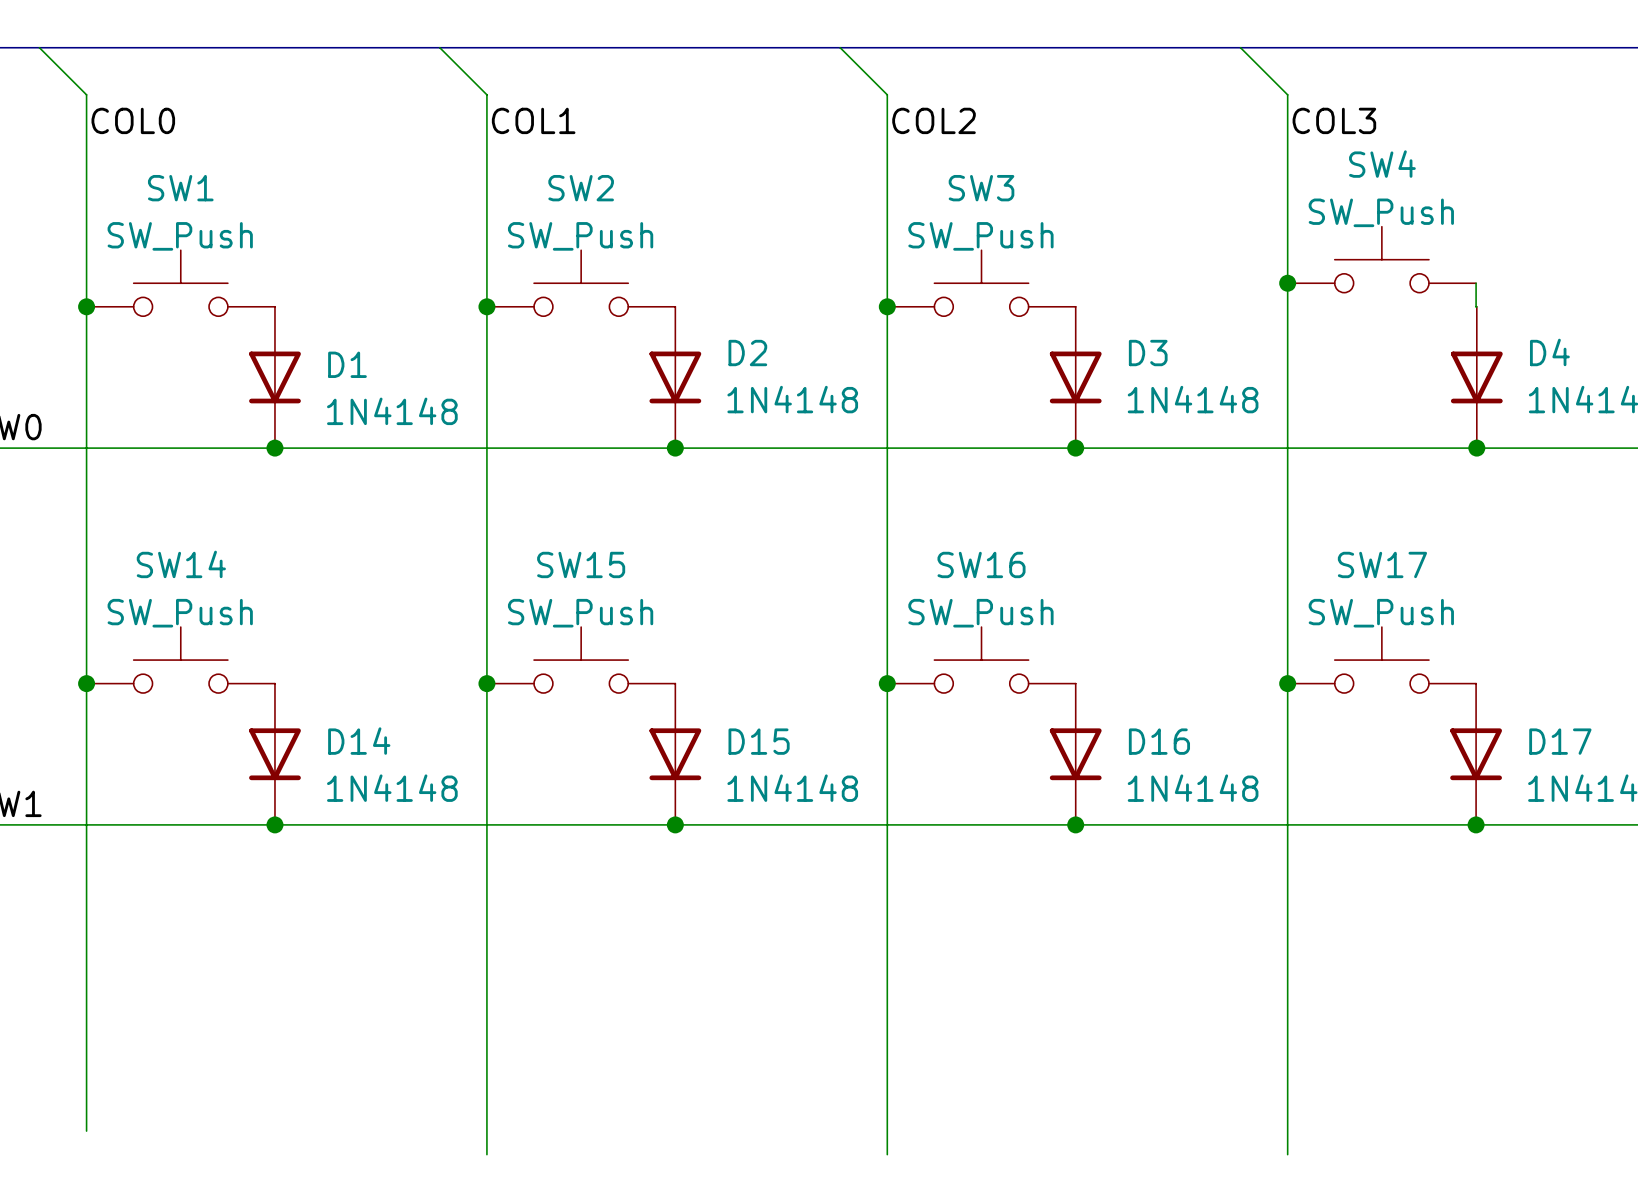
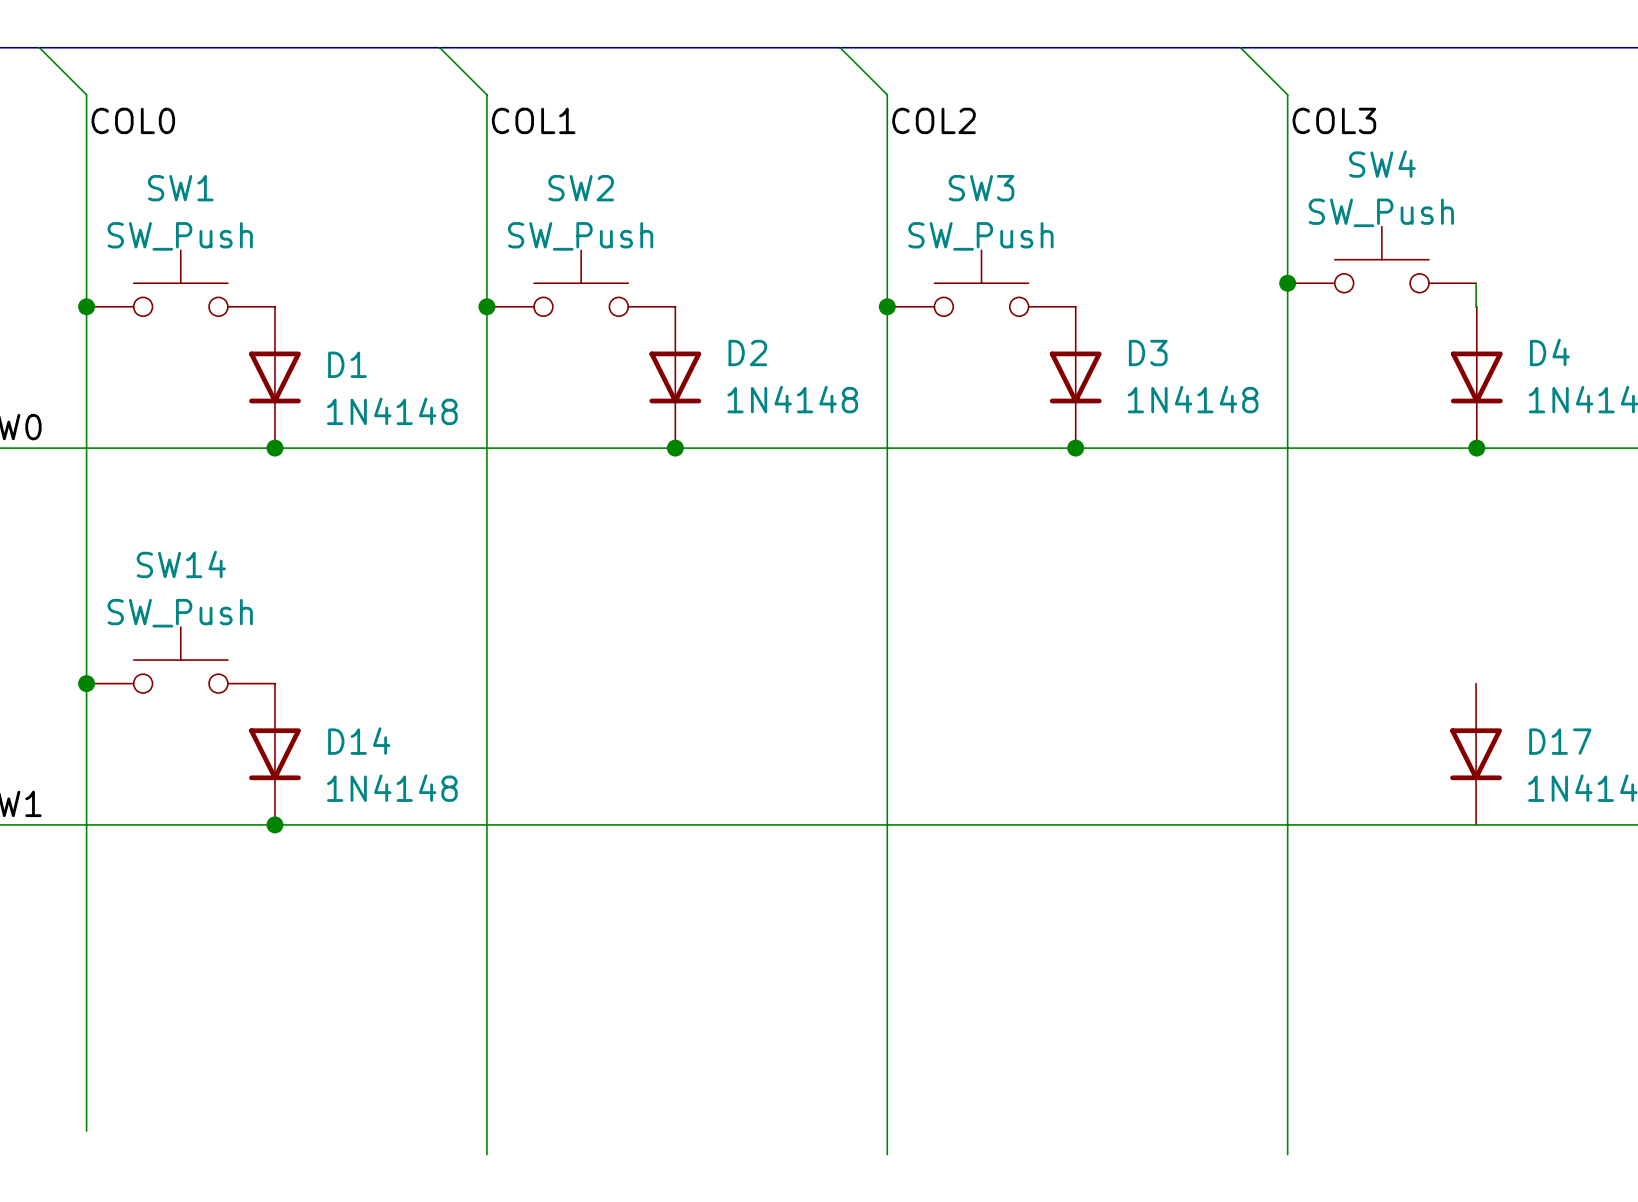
SW15: SW_Push (581, 660) -> none
SW16: SW_Push (981, 660) -> none
SW17: SW_Push (1381, 660) -> none
junction: (486, 683) -> none
junction: (887, 683) -> none
junction: (1287, 683) -> none
D15: 1N4148 (675, 754) -> none
D16: 1N4148 (1075, 754) -> none
junction: (675, 824) -> none
junction: (1075, 824) -> none
junction: (1476, 824) -> none

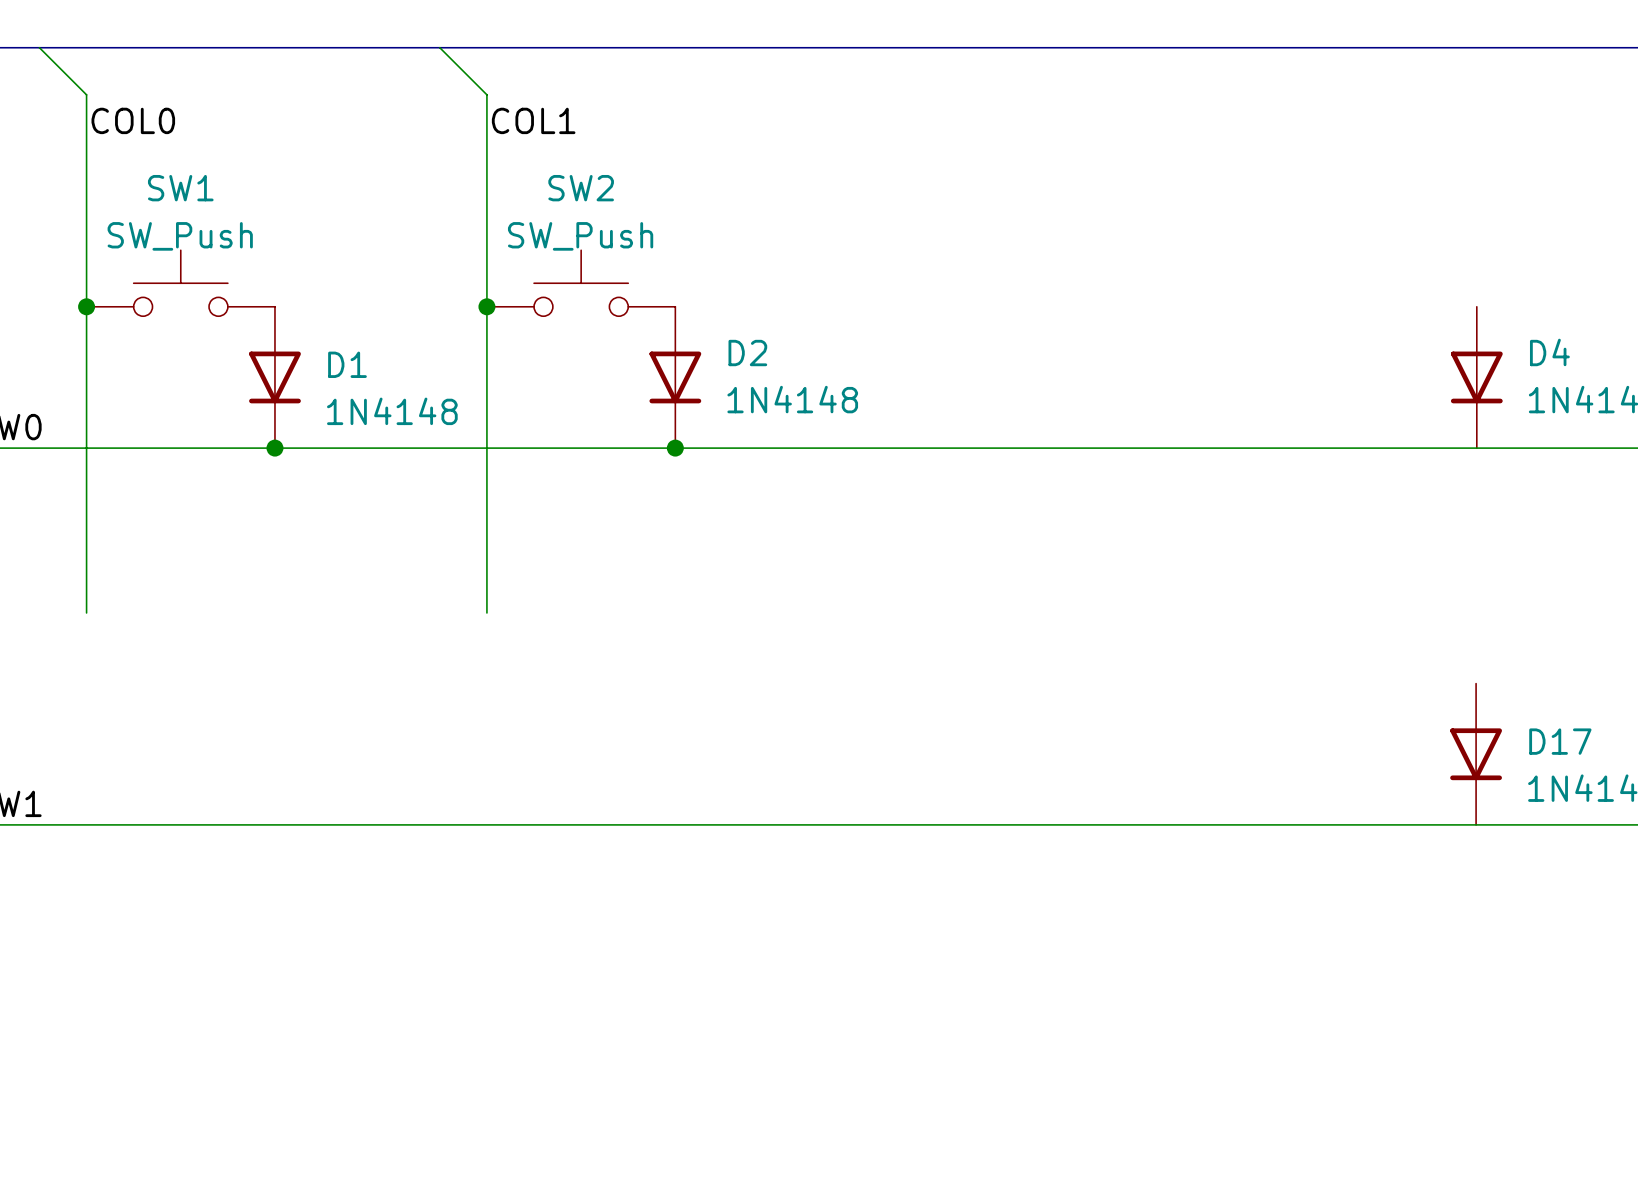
wire: (840, 47) (887, 94) (887, 1154) -> none
wire: (1240, 47) (1287, 94) (1287, 1154) -> none
label: COL2 (934, 120) -> none
label: COL3 (1334, 120) -> none
SW4: SW_Push (1381, 259) -> none
SW3: SW_Push (981, 283) -> none
junction: (1287, 283) -> none
wire: (1476, 283) (1476, 306) -> none
junction: (887, 306) -> none
D3: 1N4148 (1075, 377) -> none
junction: (1075, 448) -> none
junction: (1476, 448) -> none
wire: (86, 612) (86, 1131) -> none
wire: (486, 612) (486, 1154) -> none
SW14: SW_Push (180, 660) -> none
junction: (86, 683) -> none
D14: 1N4148 (274, 754) -> none
junction: (274, 824) -> none

